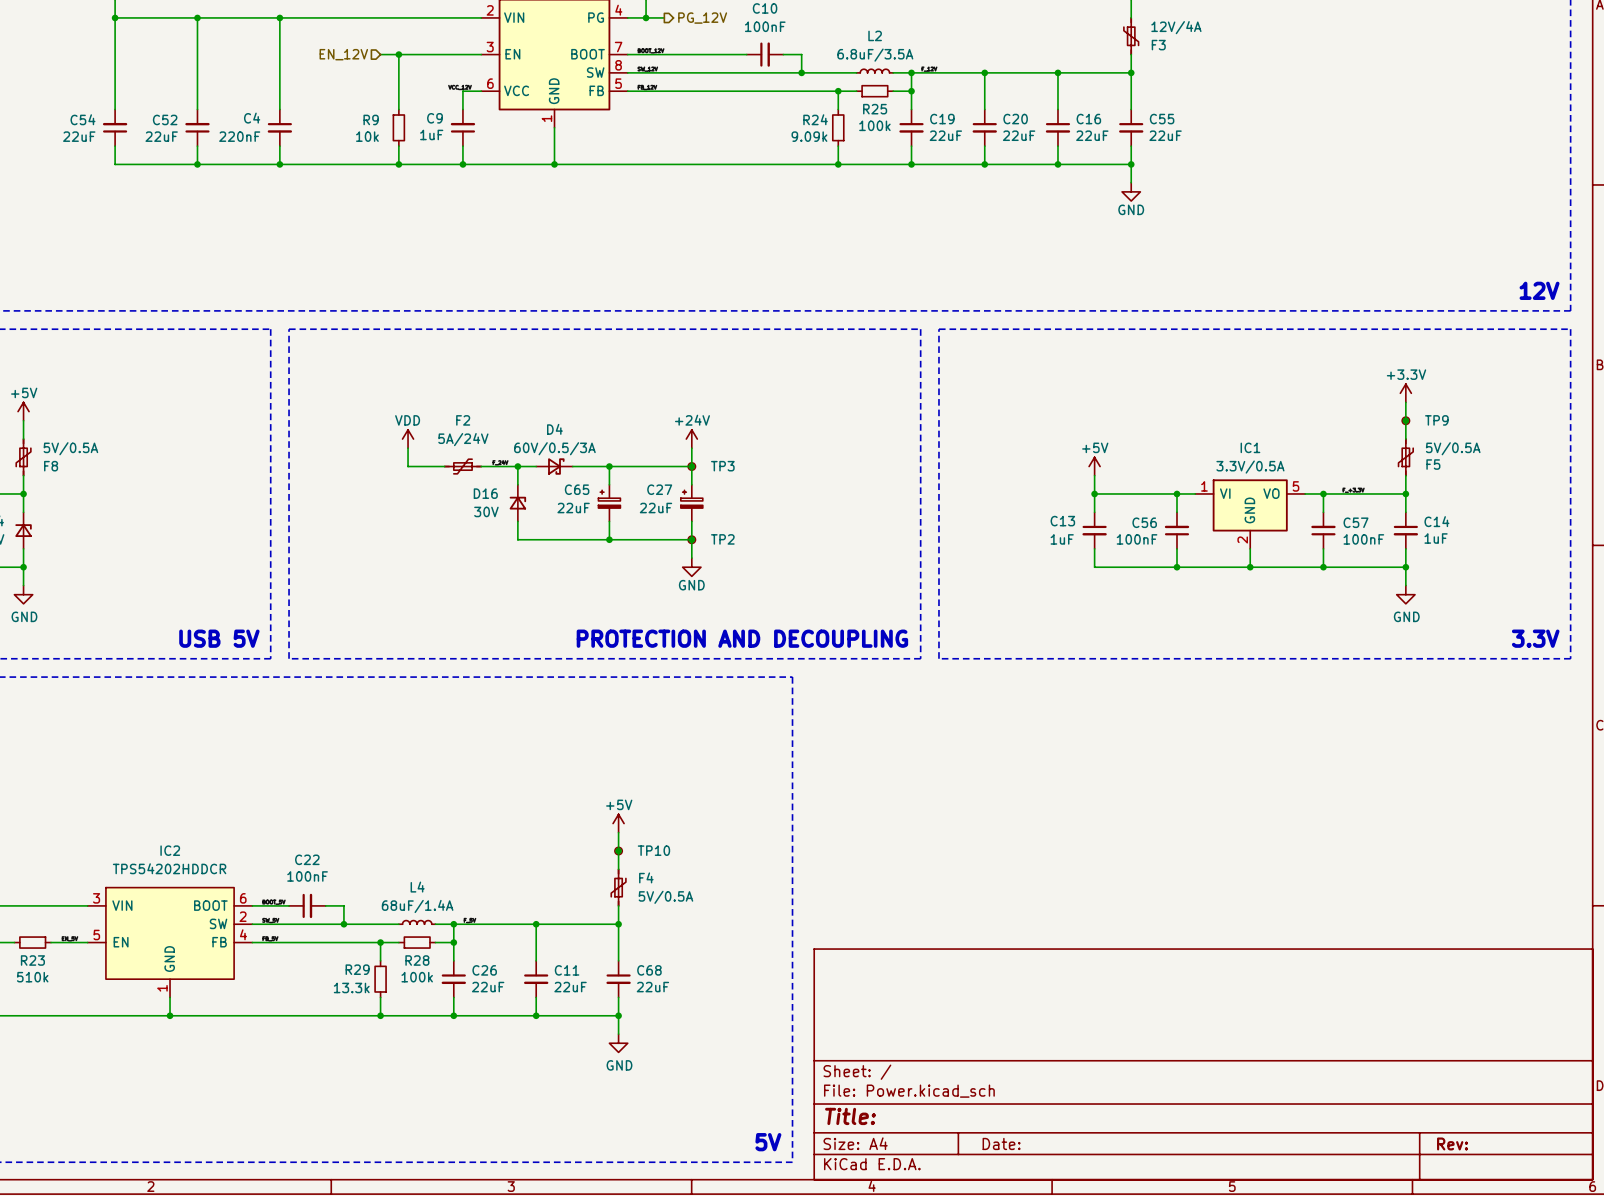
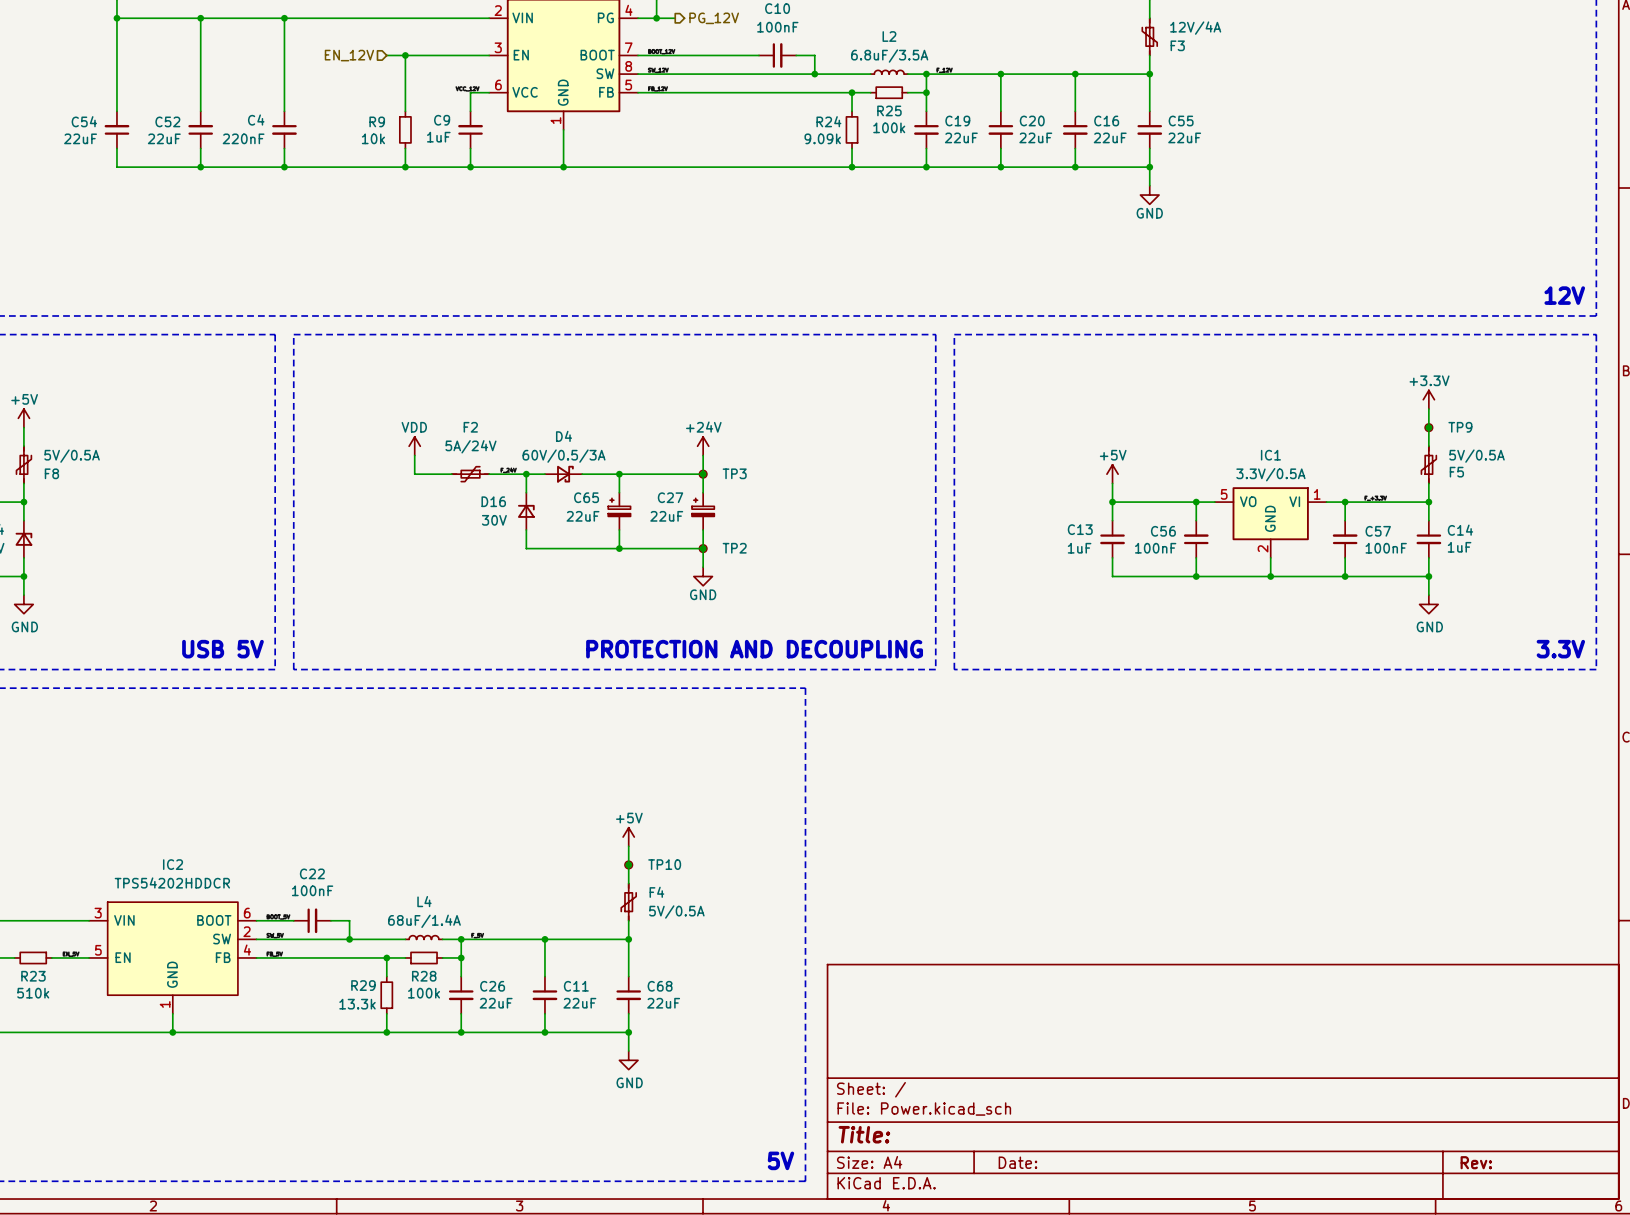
IC1 flip: as is (1250, 505) -> left-right (1270, 513)

